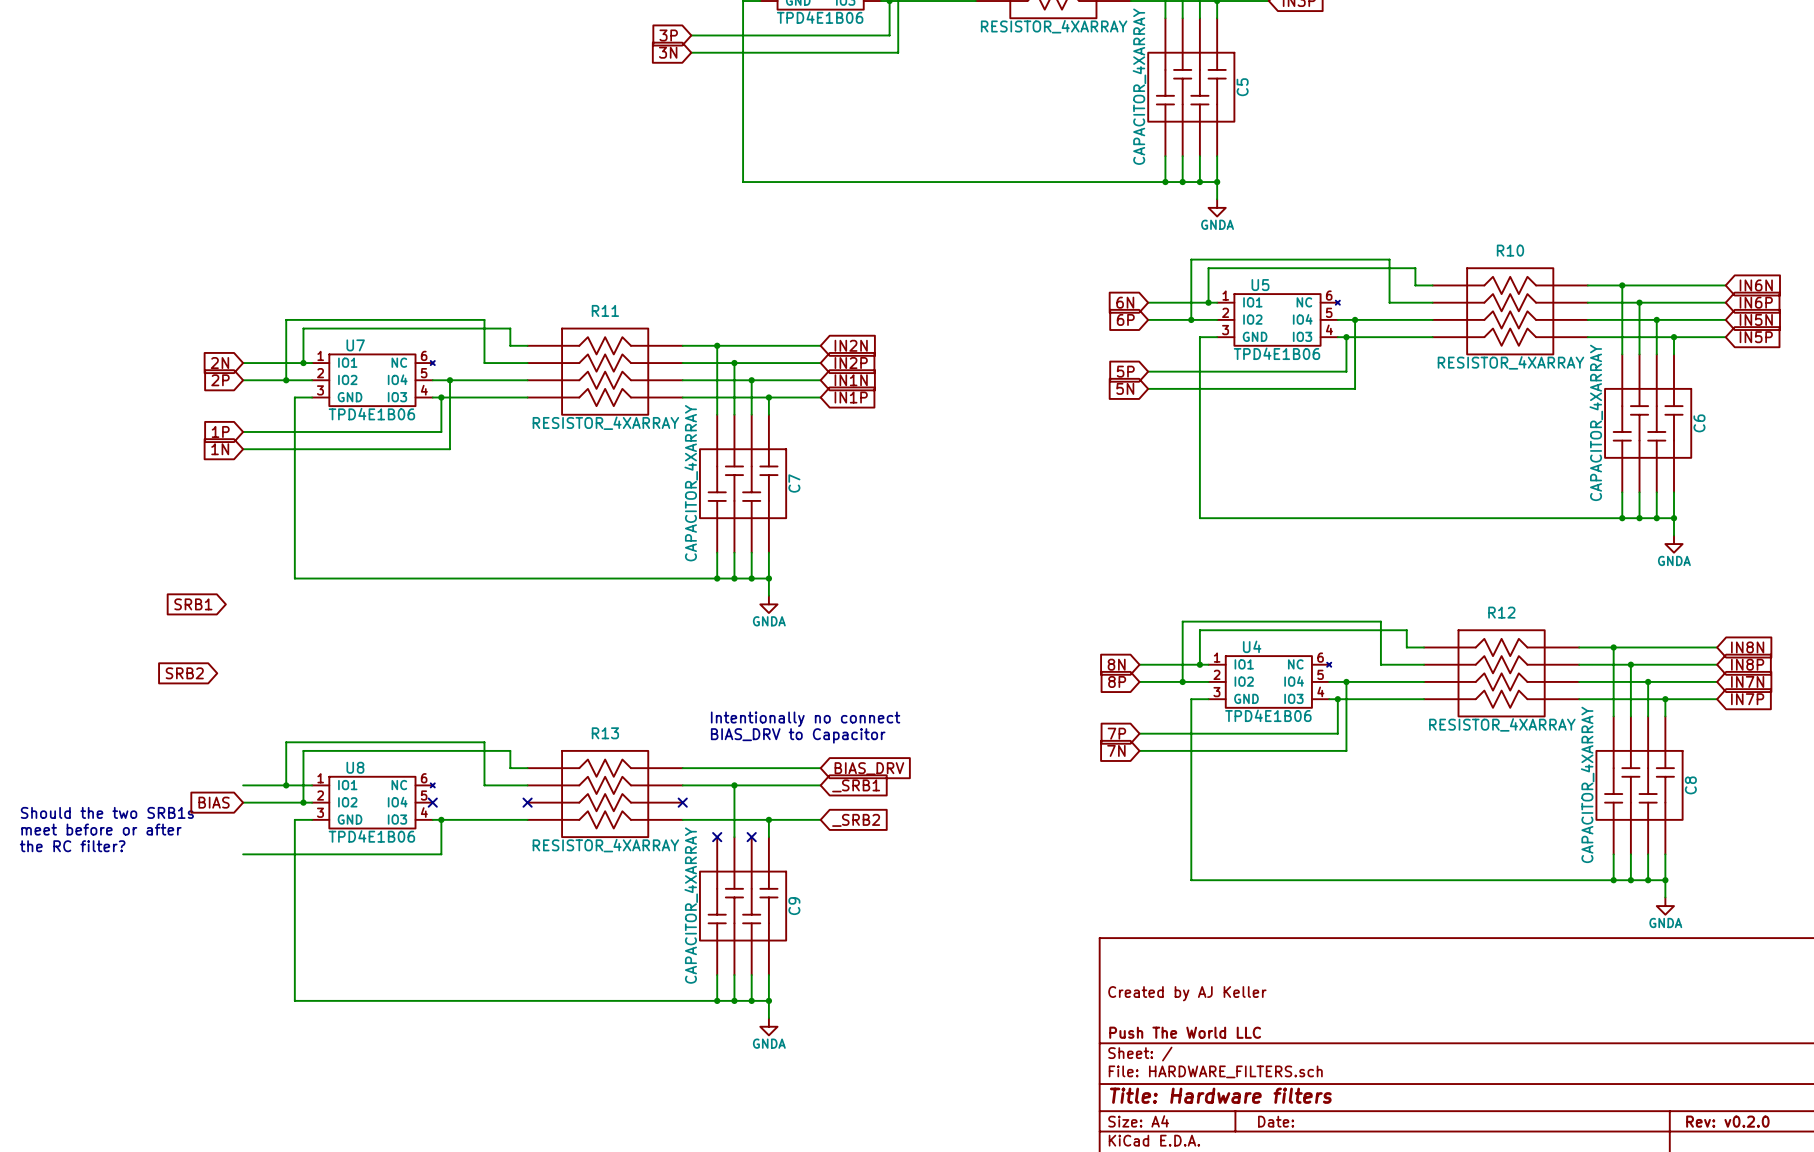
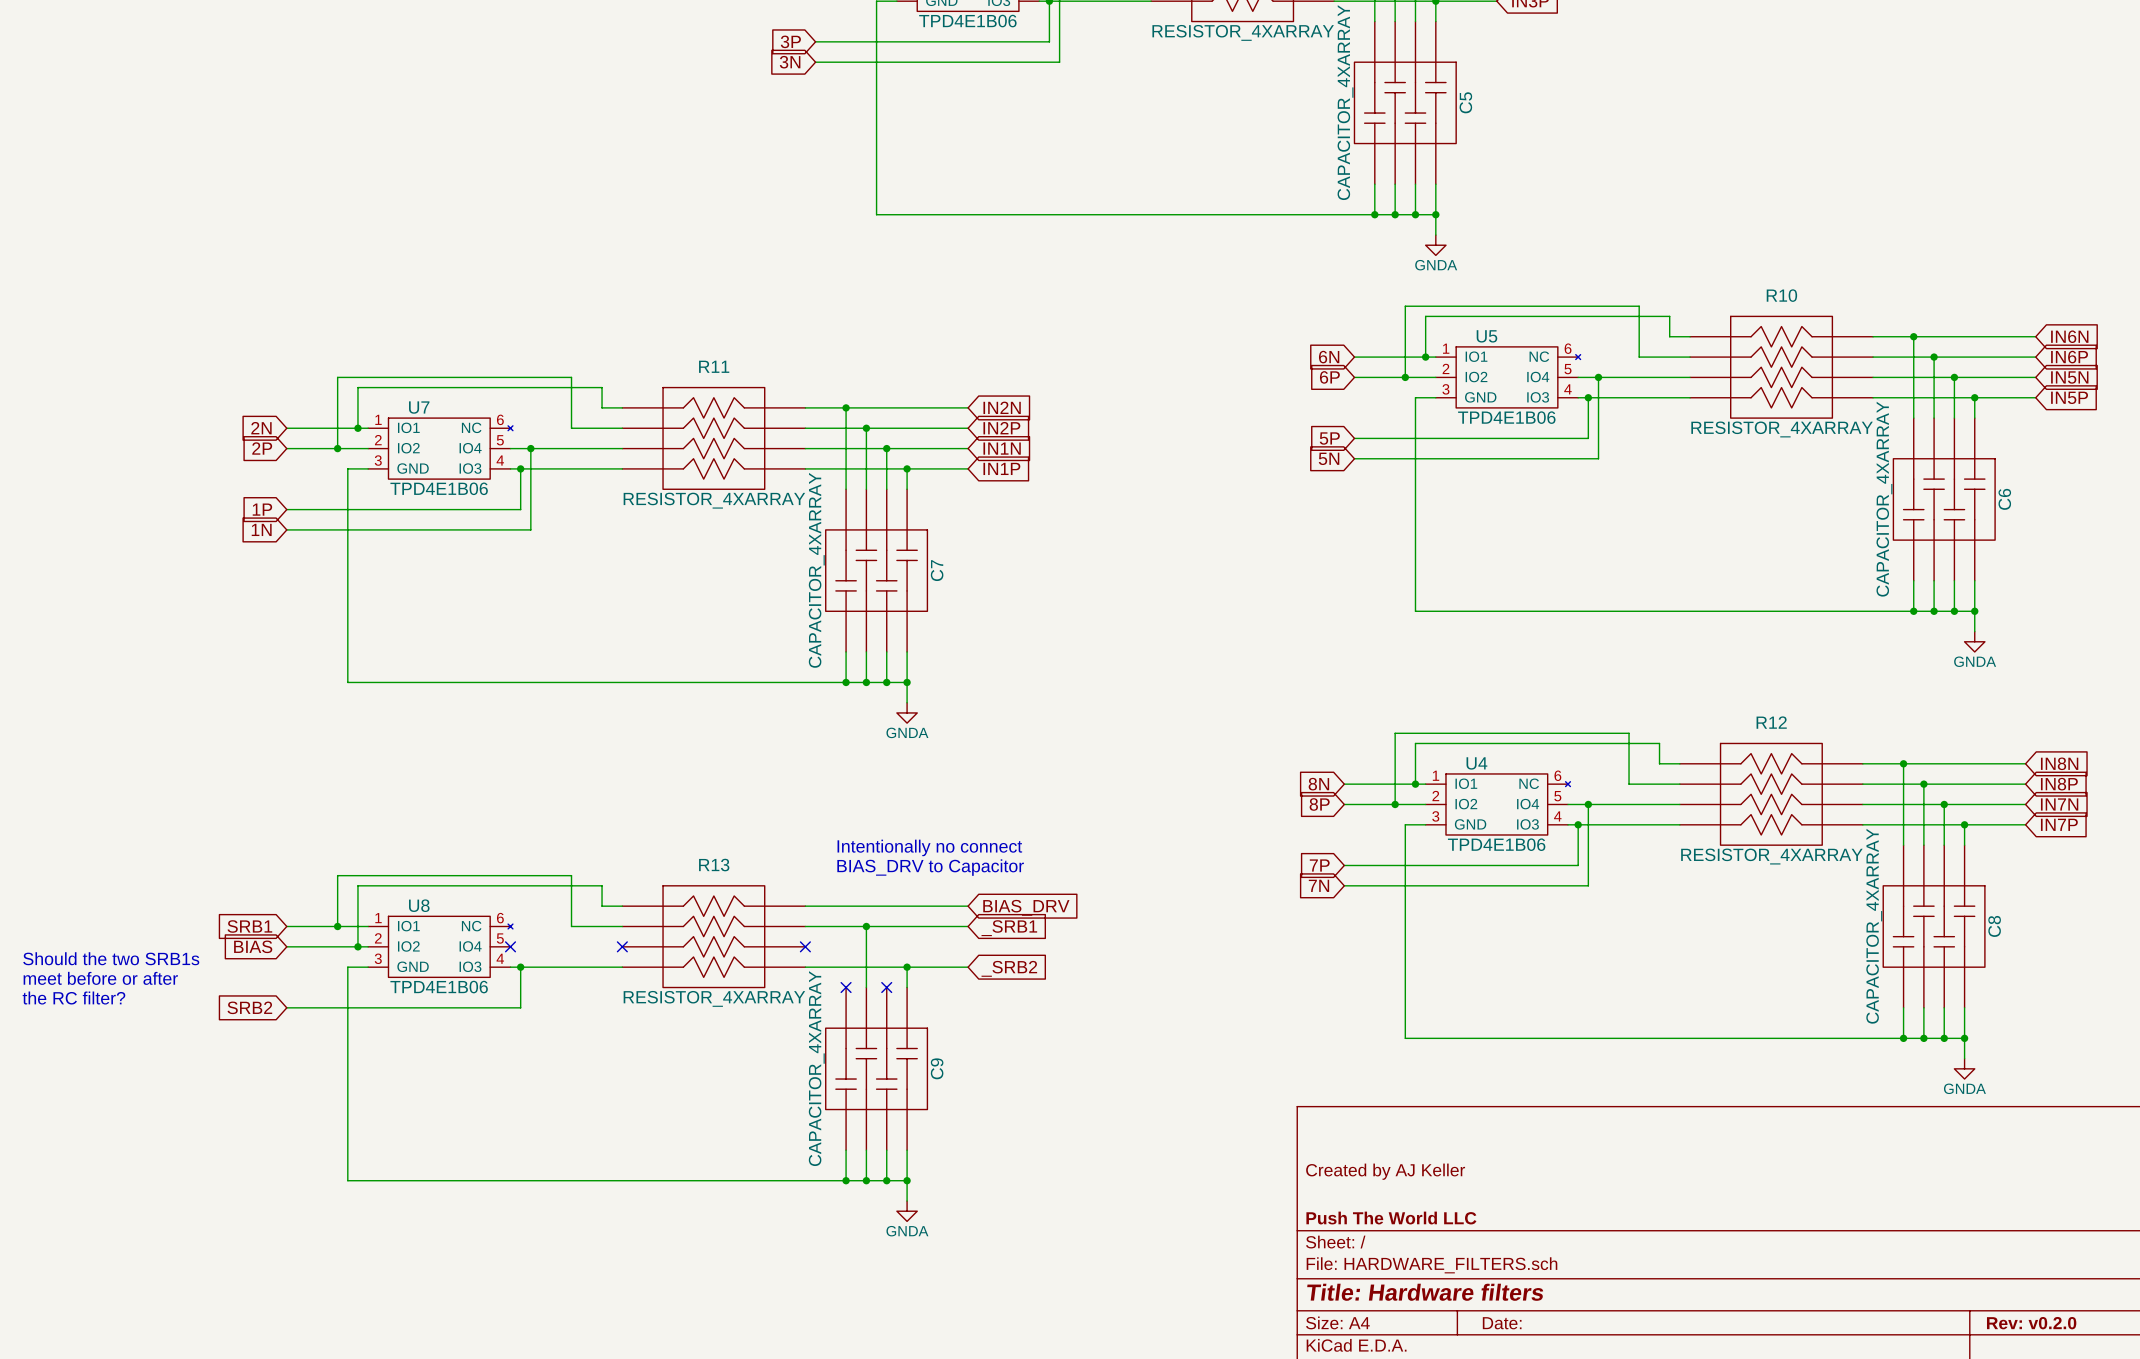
global label: SRB1 (193, 604) -> none
global label: SRB2 (184, 673) -> none
global label: none -> SRB1 (249, 926)
global label: none -> SRB2 (249, 1007)

